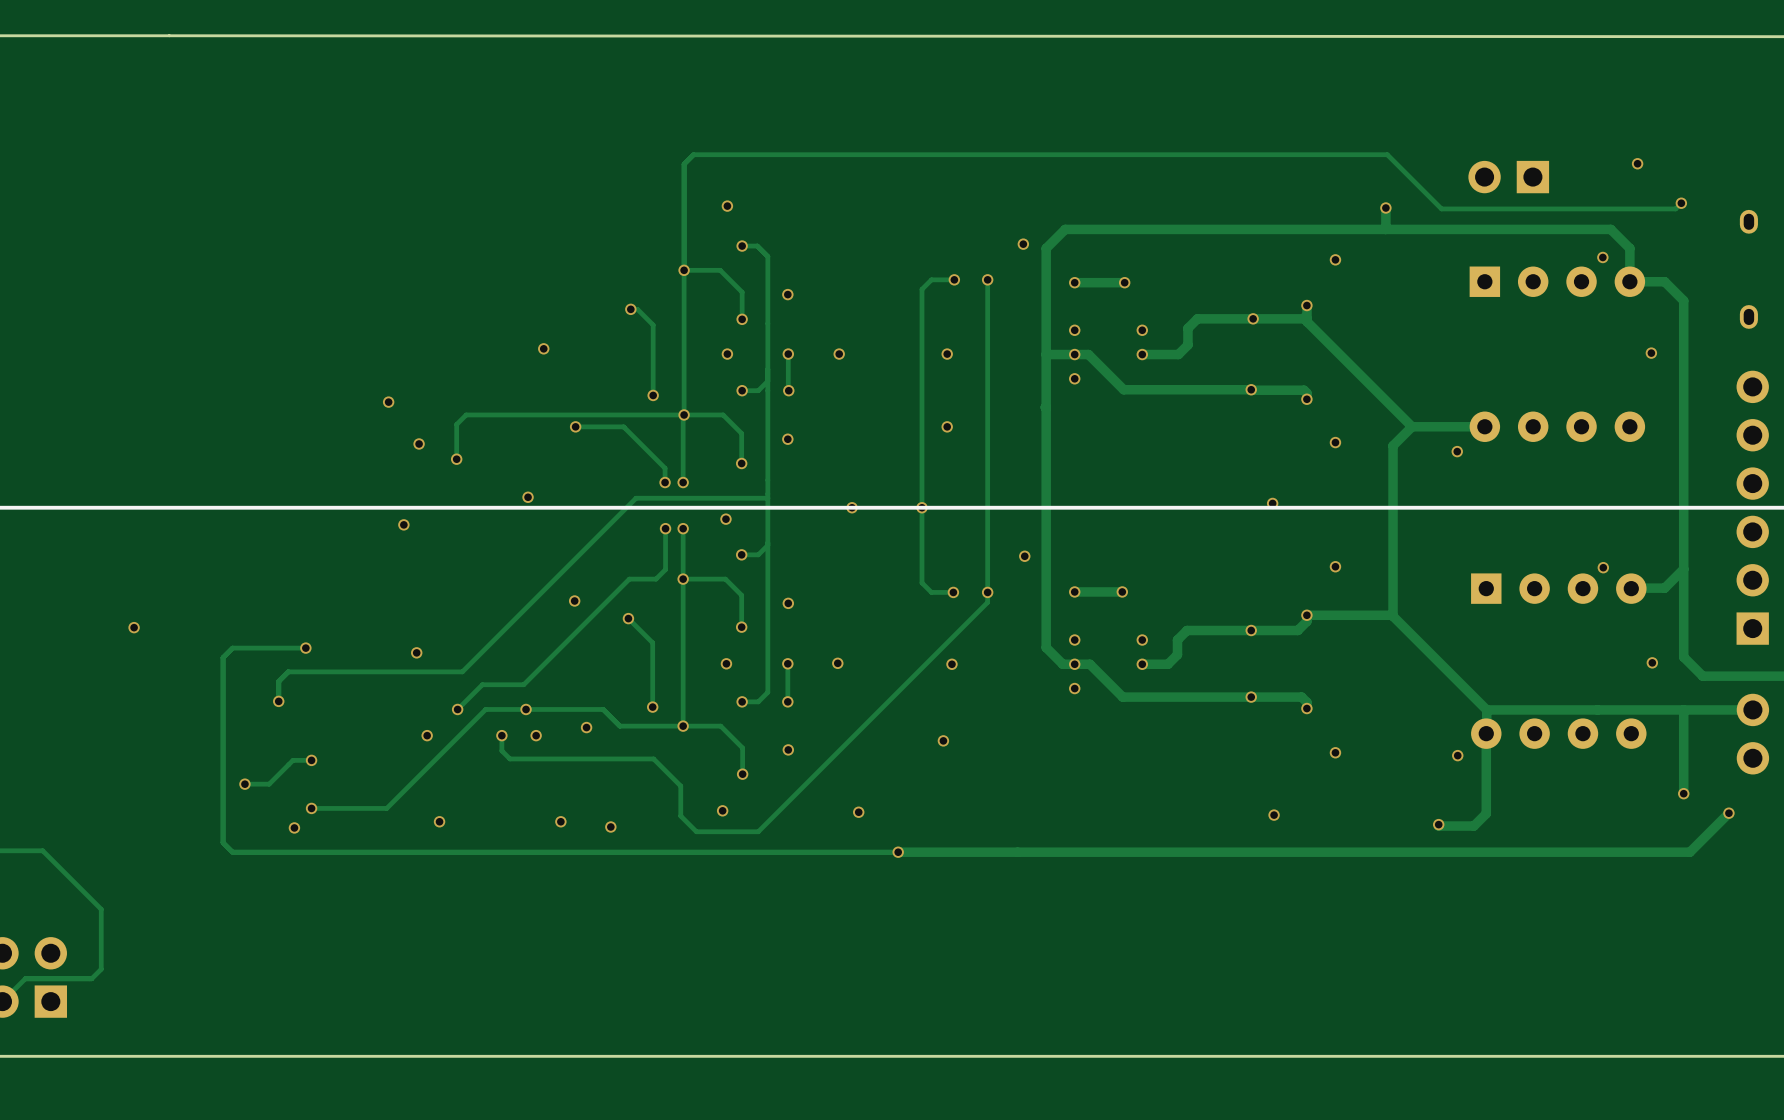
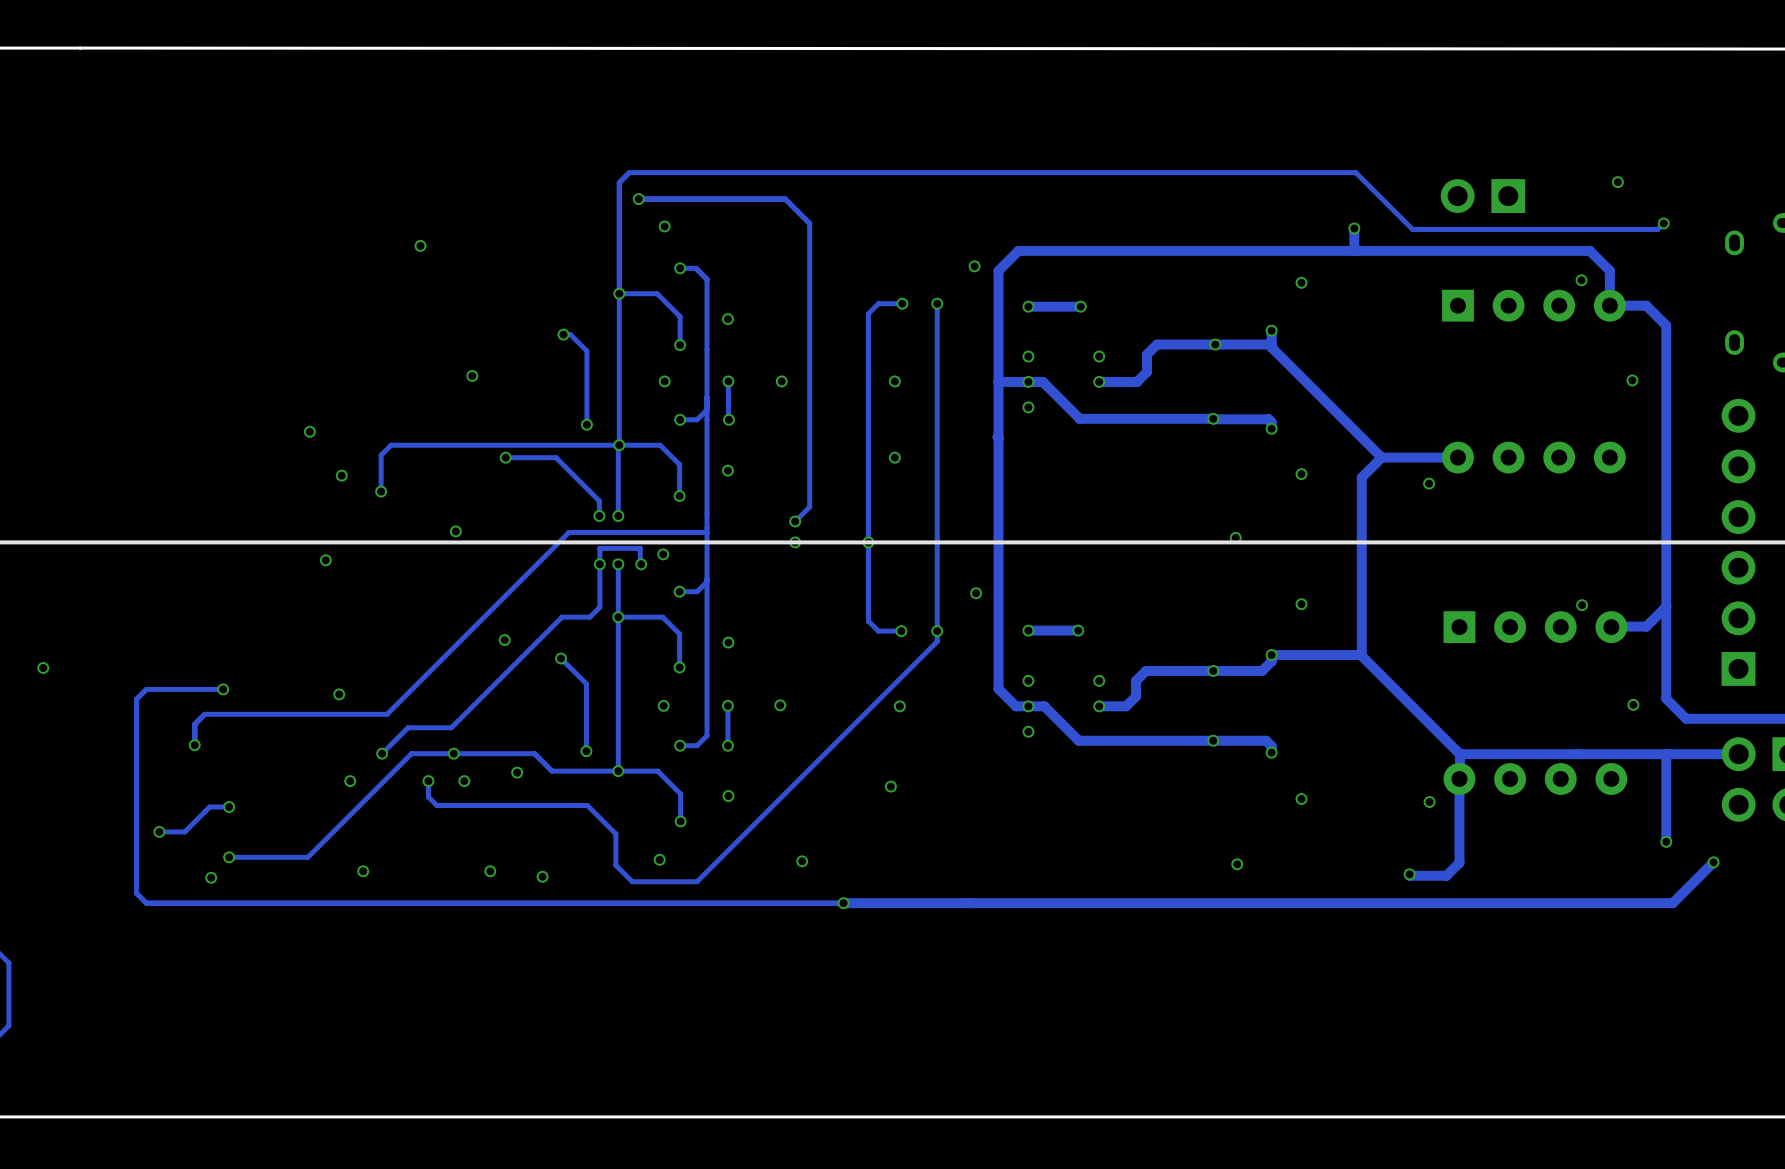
track: none -> (638, 199) (785, 199) (809, 223) (809, 507) (795, 521)
via: none -> (638, 199)
via: none -> (420, 245)
via: none -> (795, 521)
track: none -> (641, 564) (640, 548) (599, 548) (599, 564)
via: none -> (641, 564)

